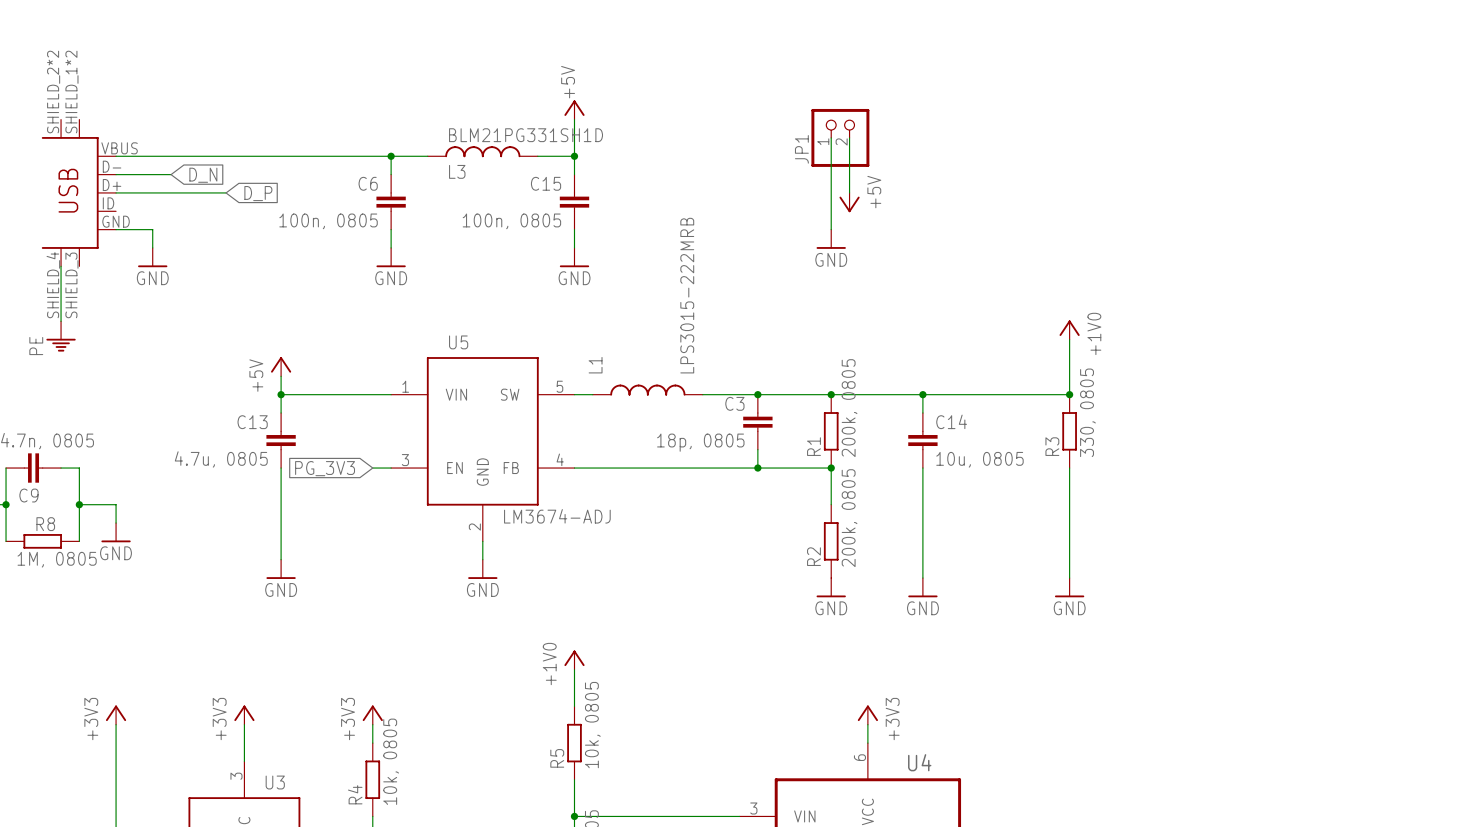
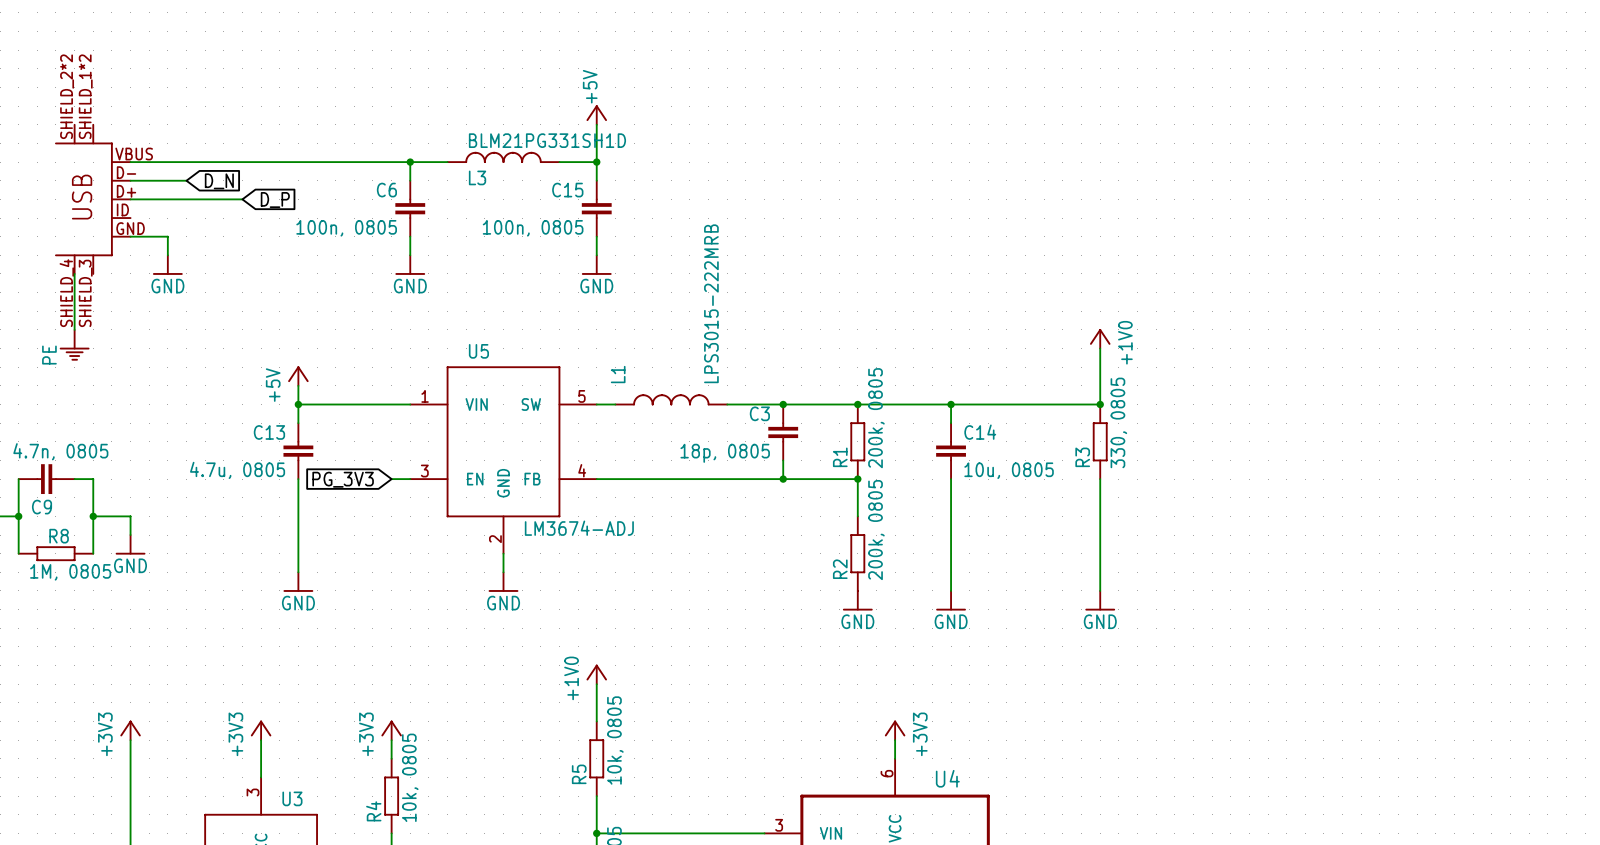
wire: (831, 137) (831, 229) -> none
JP1: (840, 137) -> none
wire: (849, 137) (849, 192) -> none
power symbol: +5V (849, 202) -> none
power symbol: GND (831, 239) -> none

